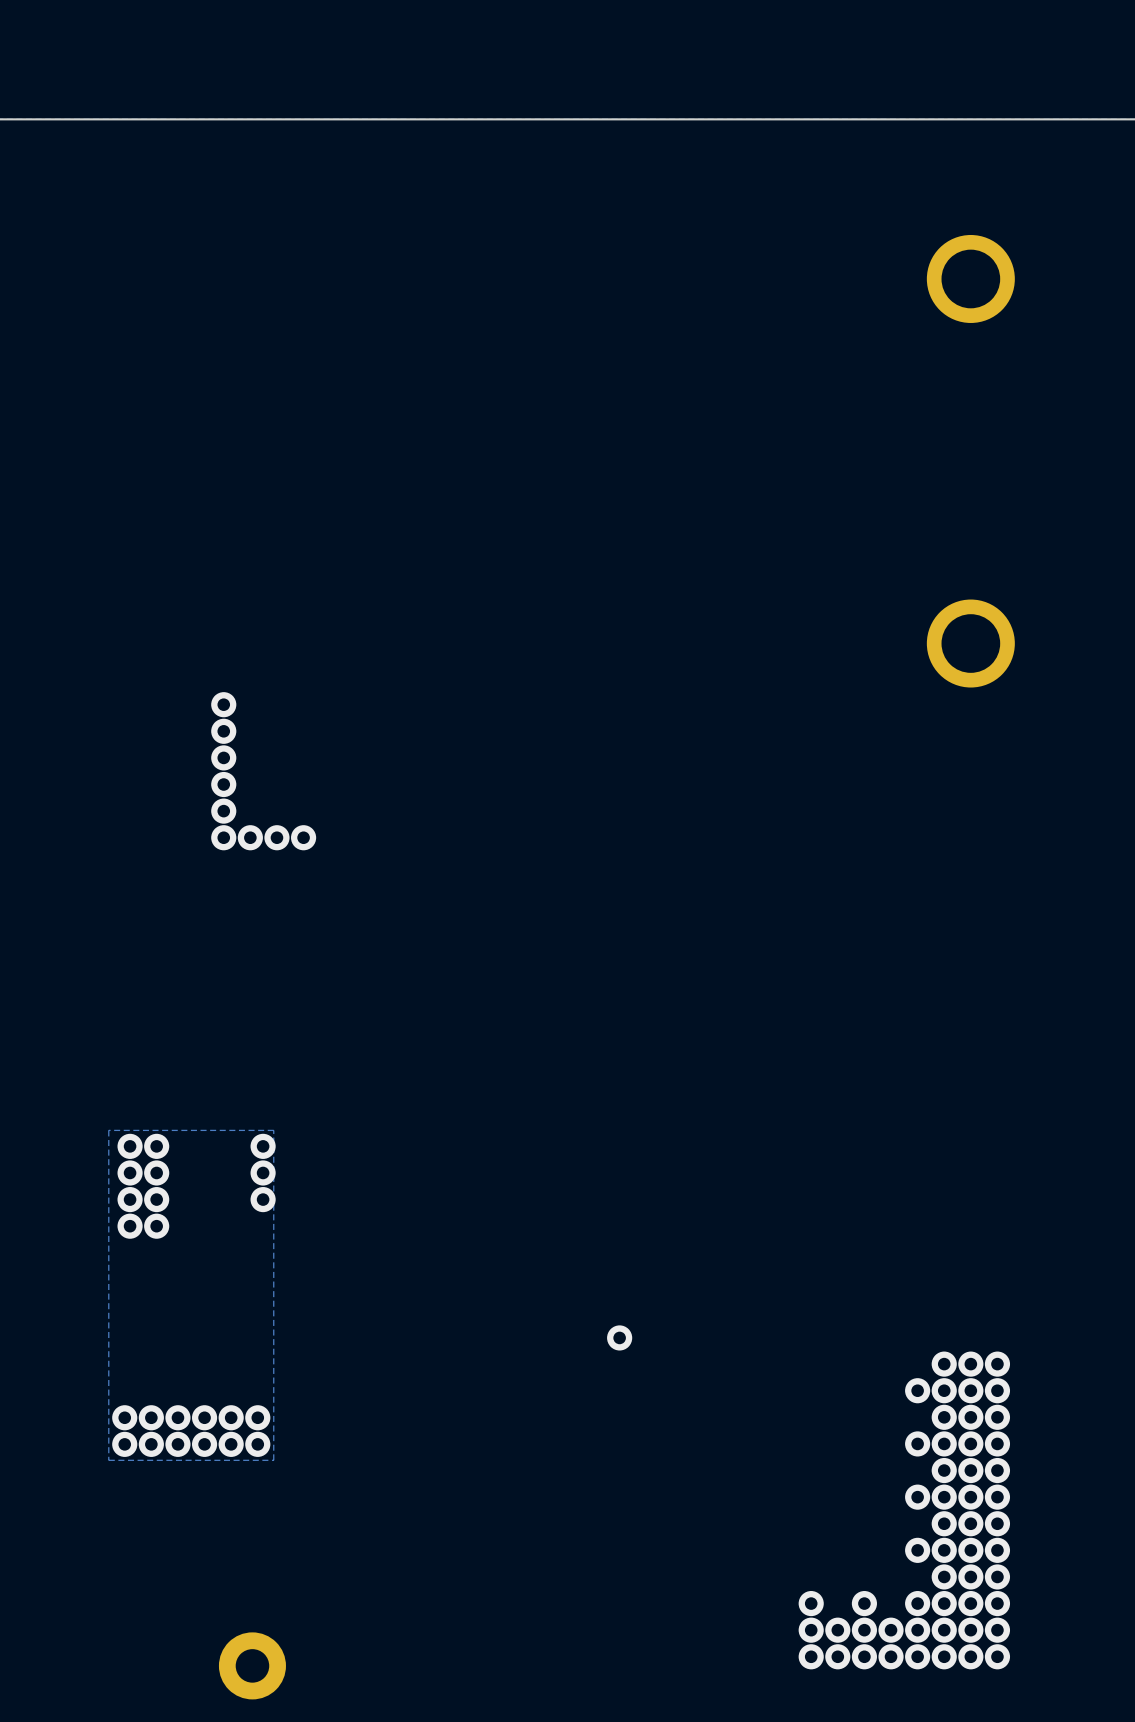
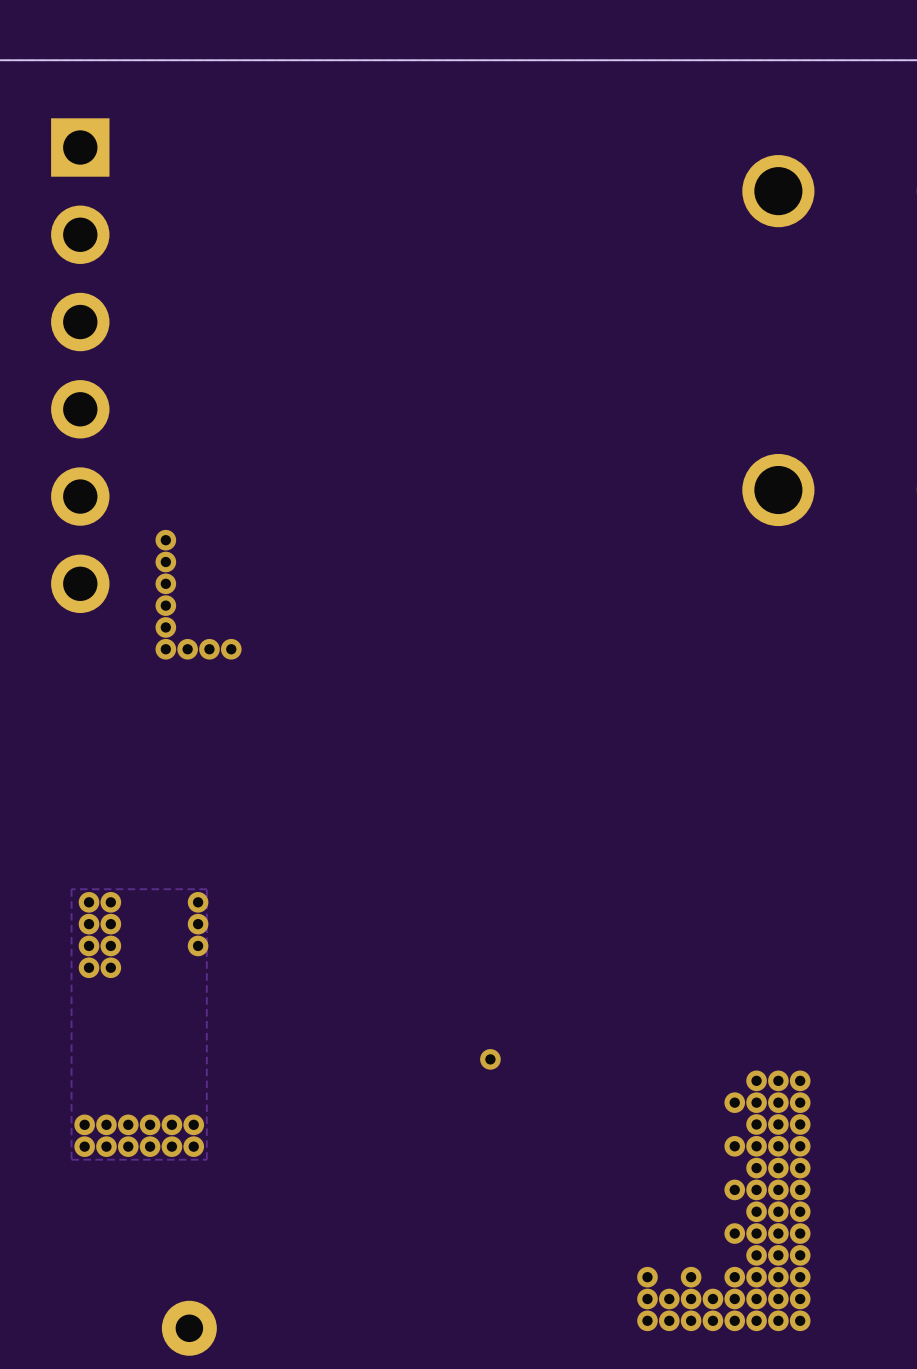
part: none -> (80, 365)

